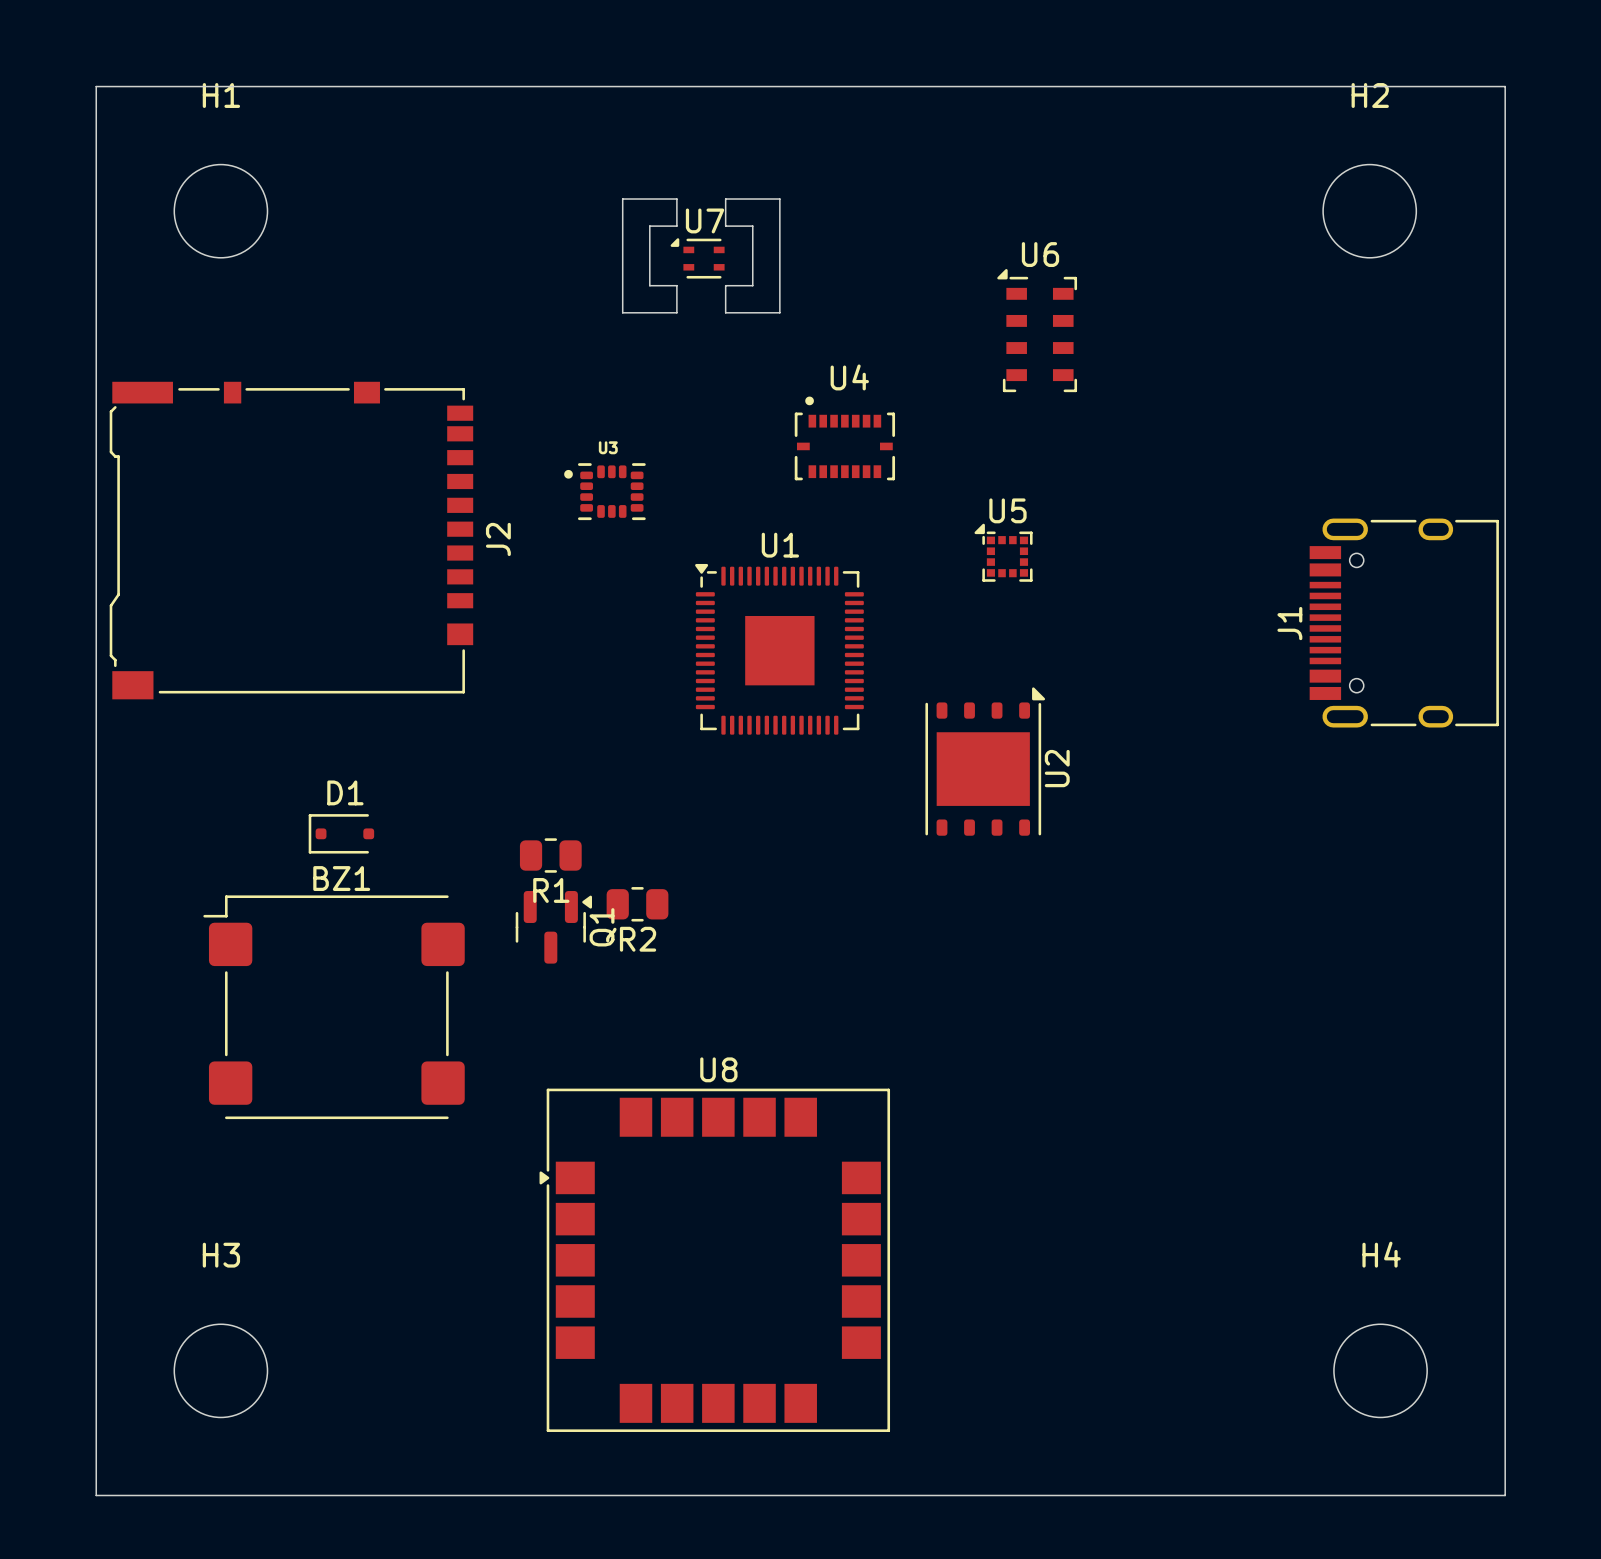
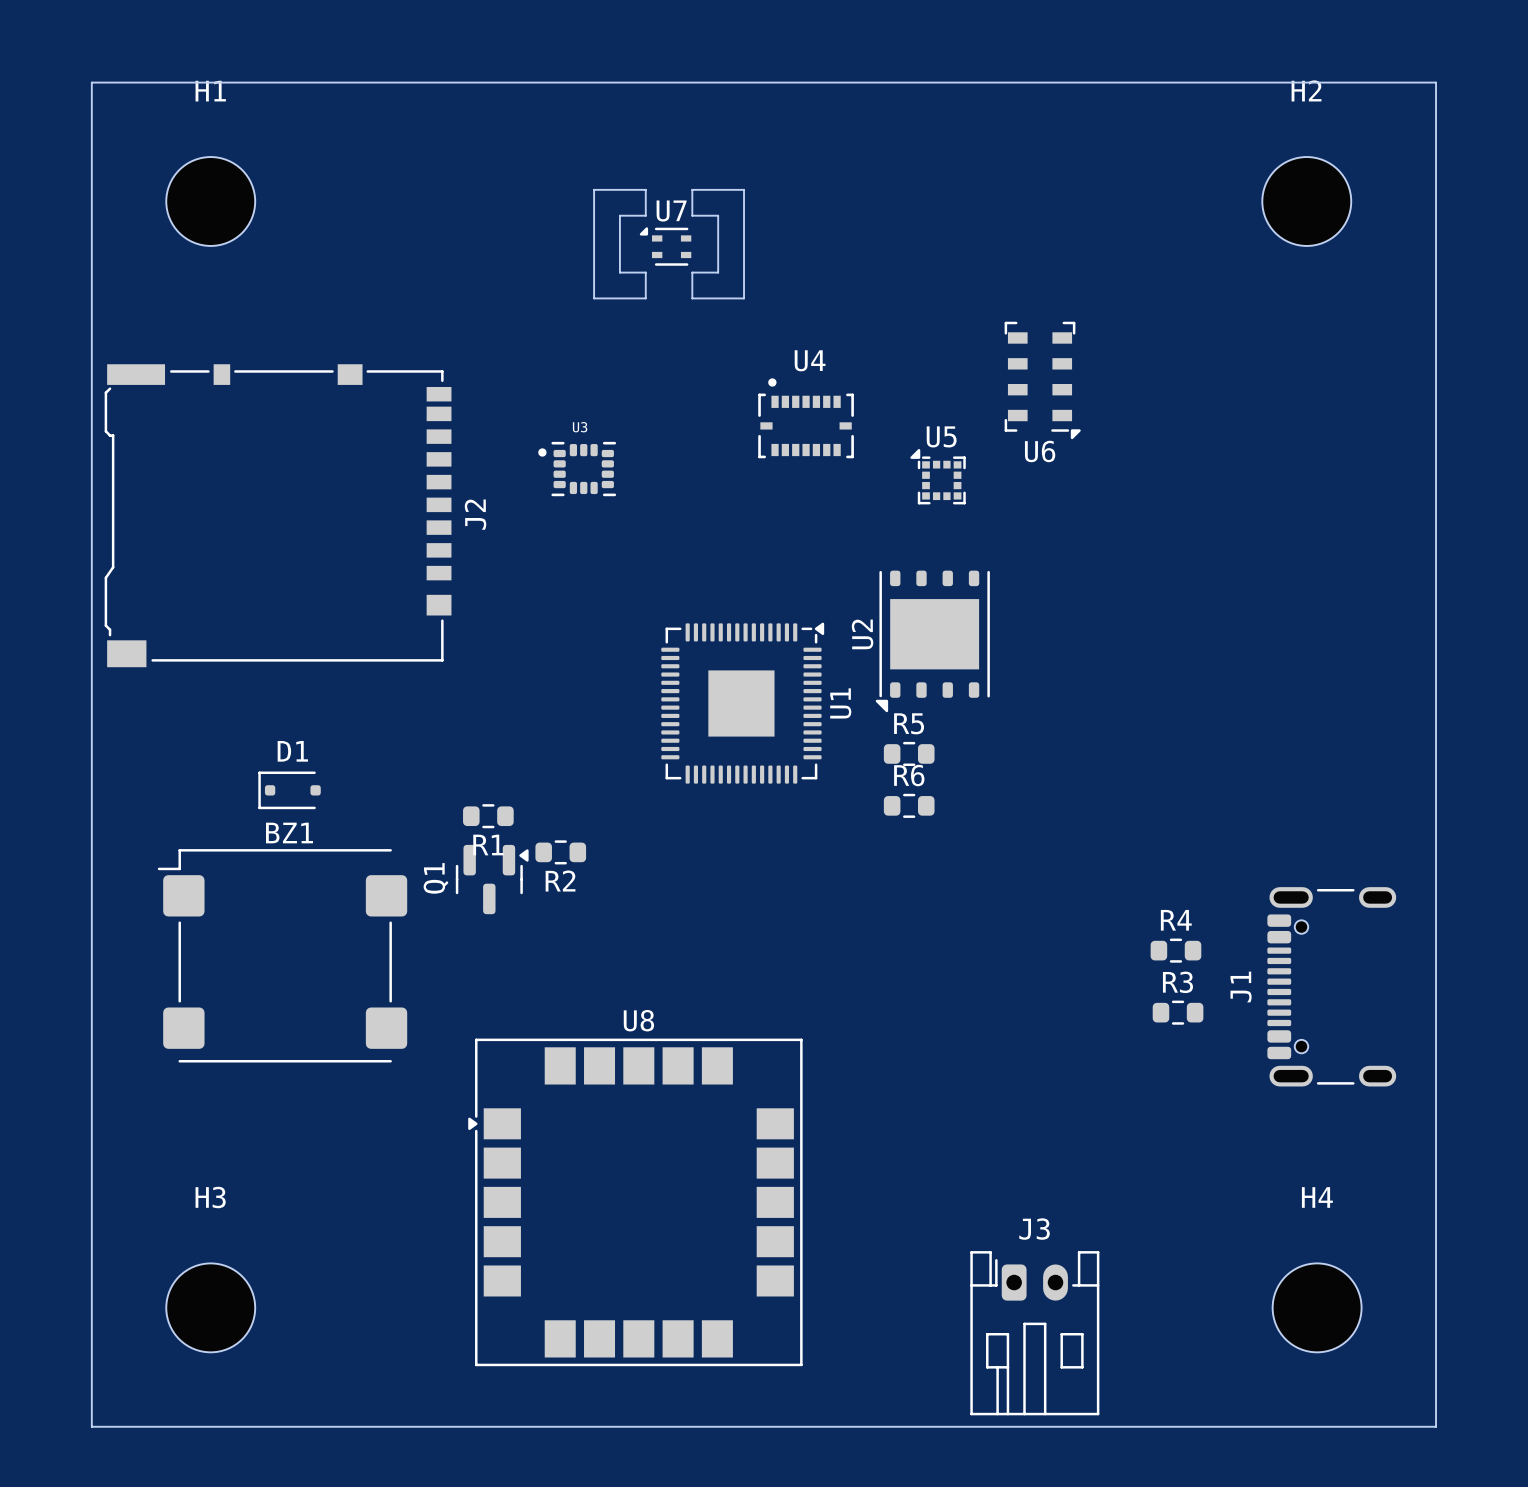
U6 rotation: 0° (1037, 330) -> 180° (1042, 380)
U6 position: (1037, 330) -> (1042, 380)
J1 footprint: [1309, 518, 1499, 728] -> [1267, 887, 1397, 1087]
U5 position: (1003, 552) -> (938, 476)
U1 rotation: 0° (779, 649) -> 90° clockwise (742, 703)
U2 rotation: 0° (985, 761) -> 180° (932, 641)
U2 position: (985, 761) -> (932, 641)
R5: none -> (909, 753)
D1 position: (341, 833) -> (289, 790)
R1 footprint: [519, 838, 582, 873] -> [463, 804, 514, 829]
R6: none -> (909, 805)
R2 footprint: [606, 887, 669, 922] -> [535, 840, 587, 865]
Q1 position: (553, 927) -> (492, 879)
Q1 name position: Q1 (603, 927) -> Q1 (436, 878)
R4: none -> (1175, 950)
BZ1 position: (334, 1007) -> (282, 955)
R3: none -> (1178, 1012)
U8 position: (714, 1260) -> (635, 1202)
J3: none -> (1034, 1333)

